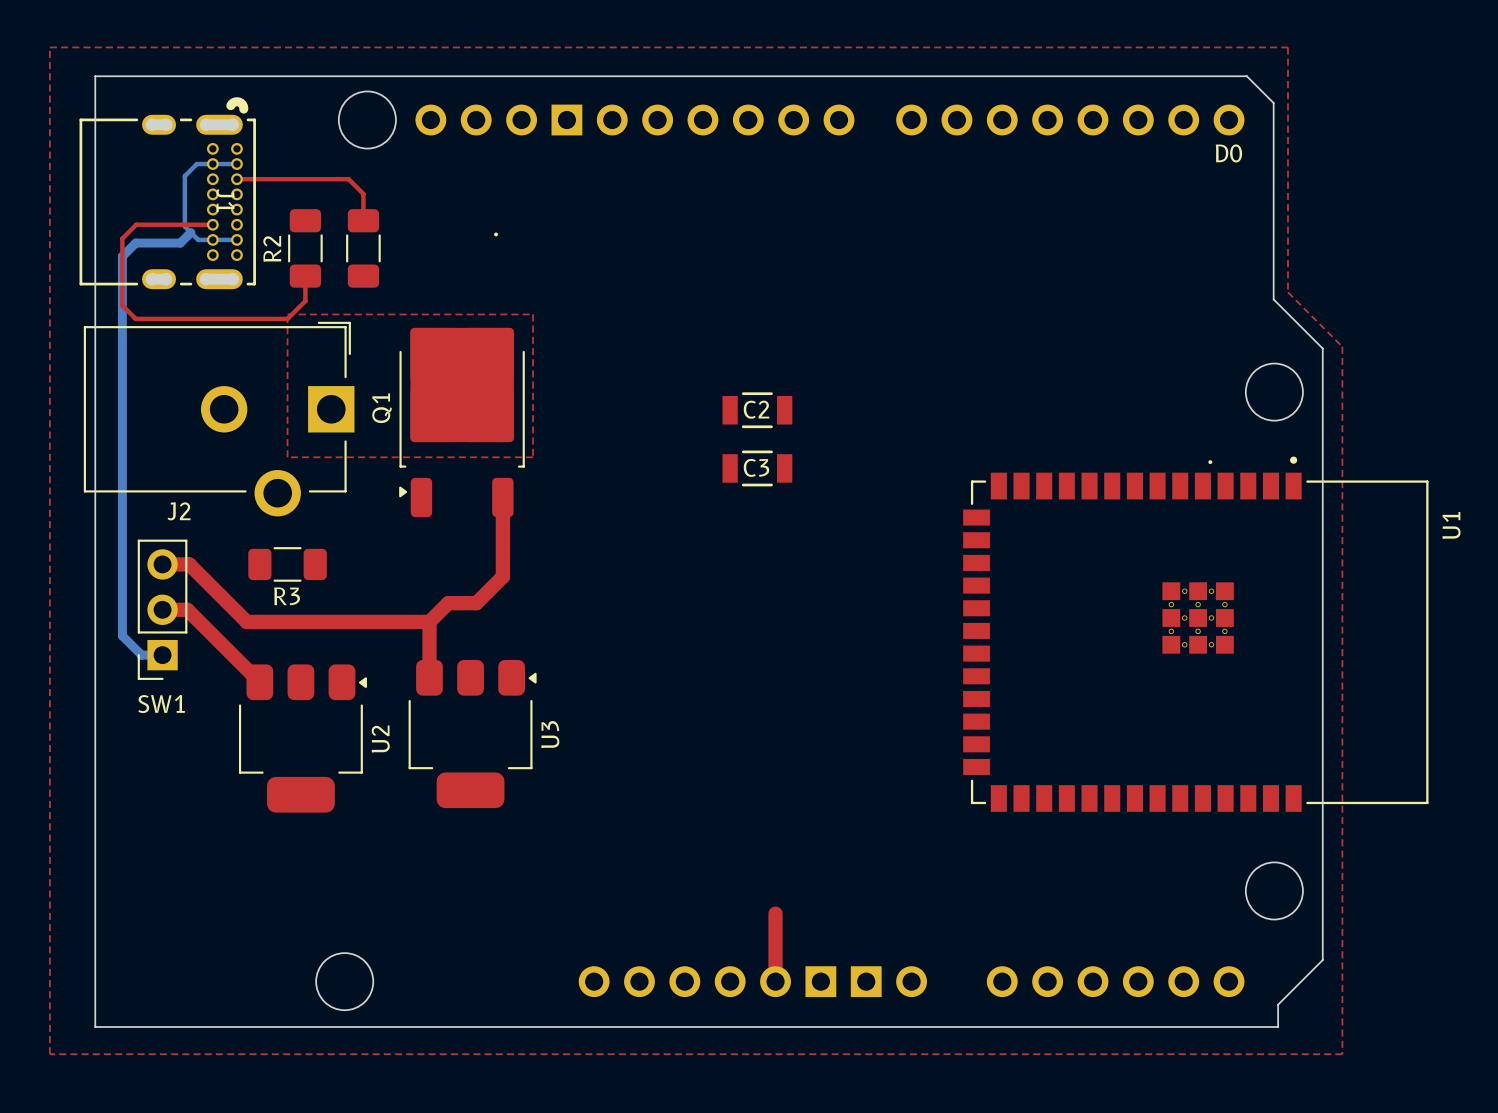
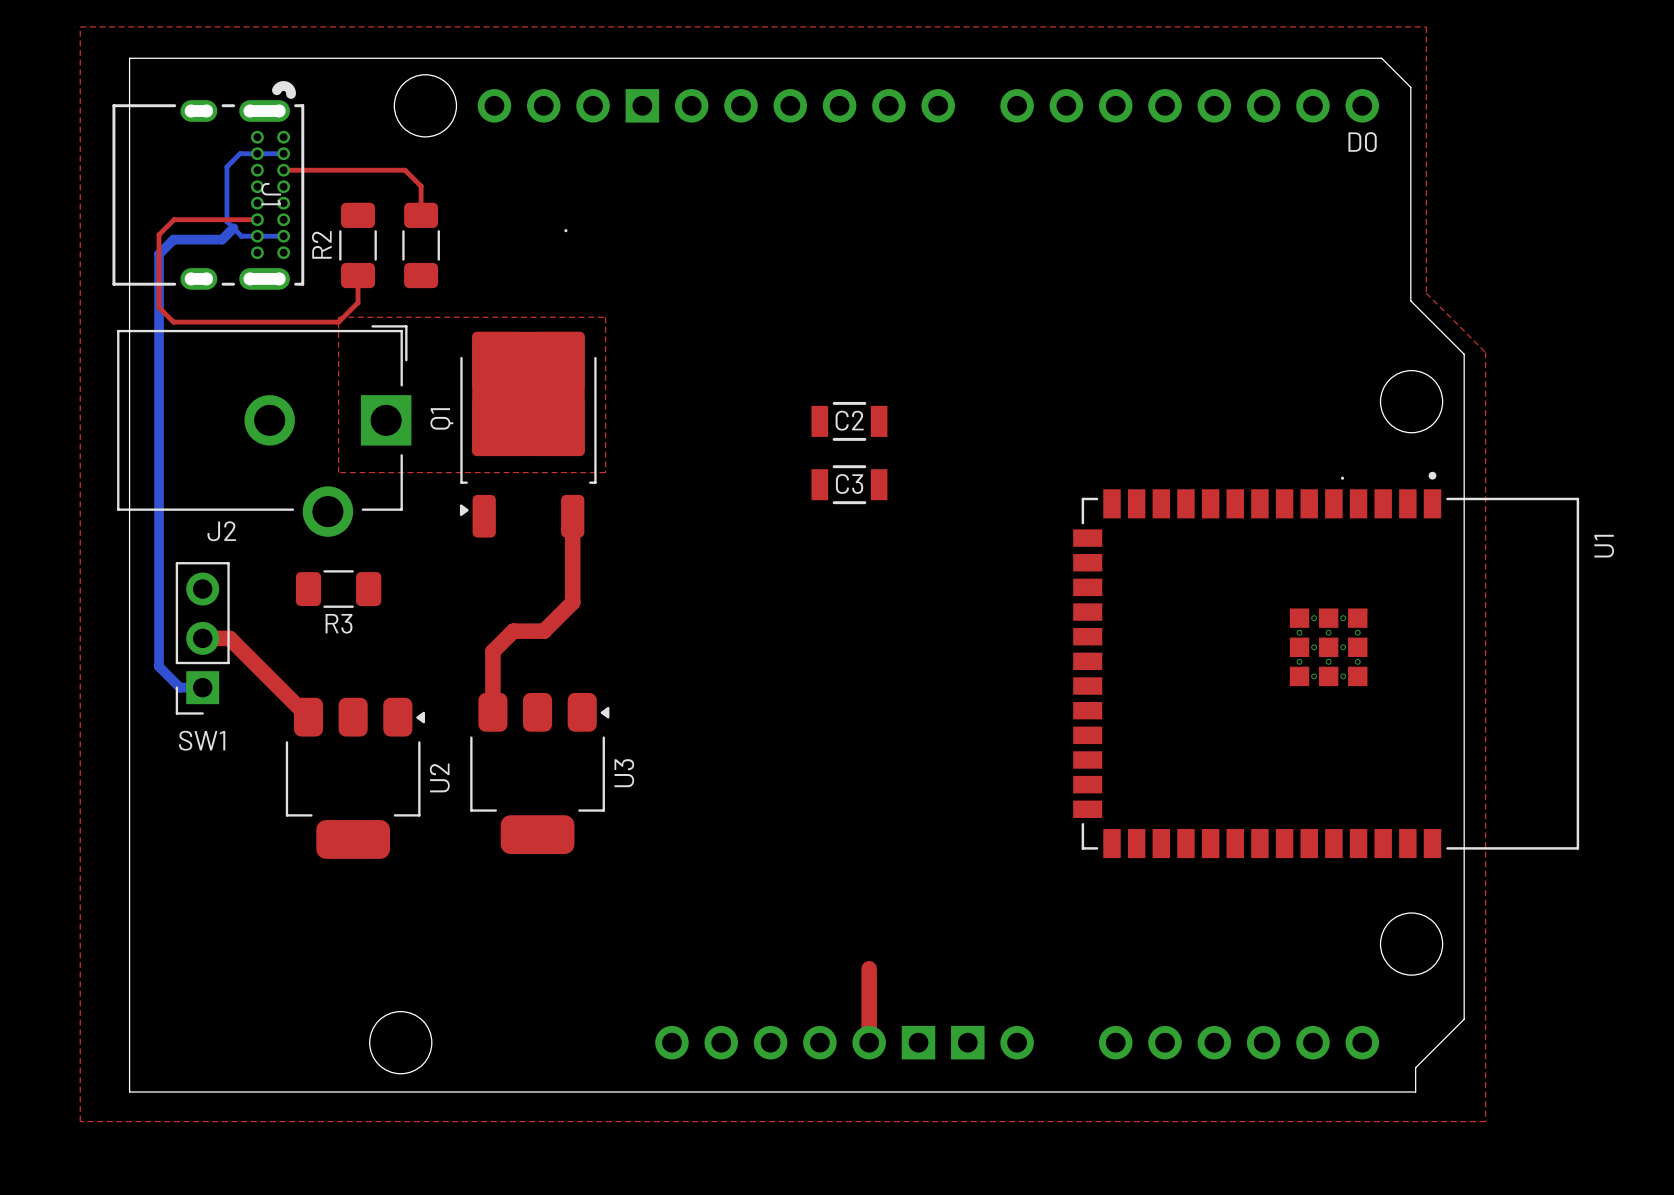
top track: (162, 564) (189, 564) (246, 621) (429, 621) -> none

